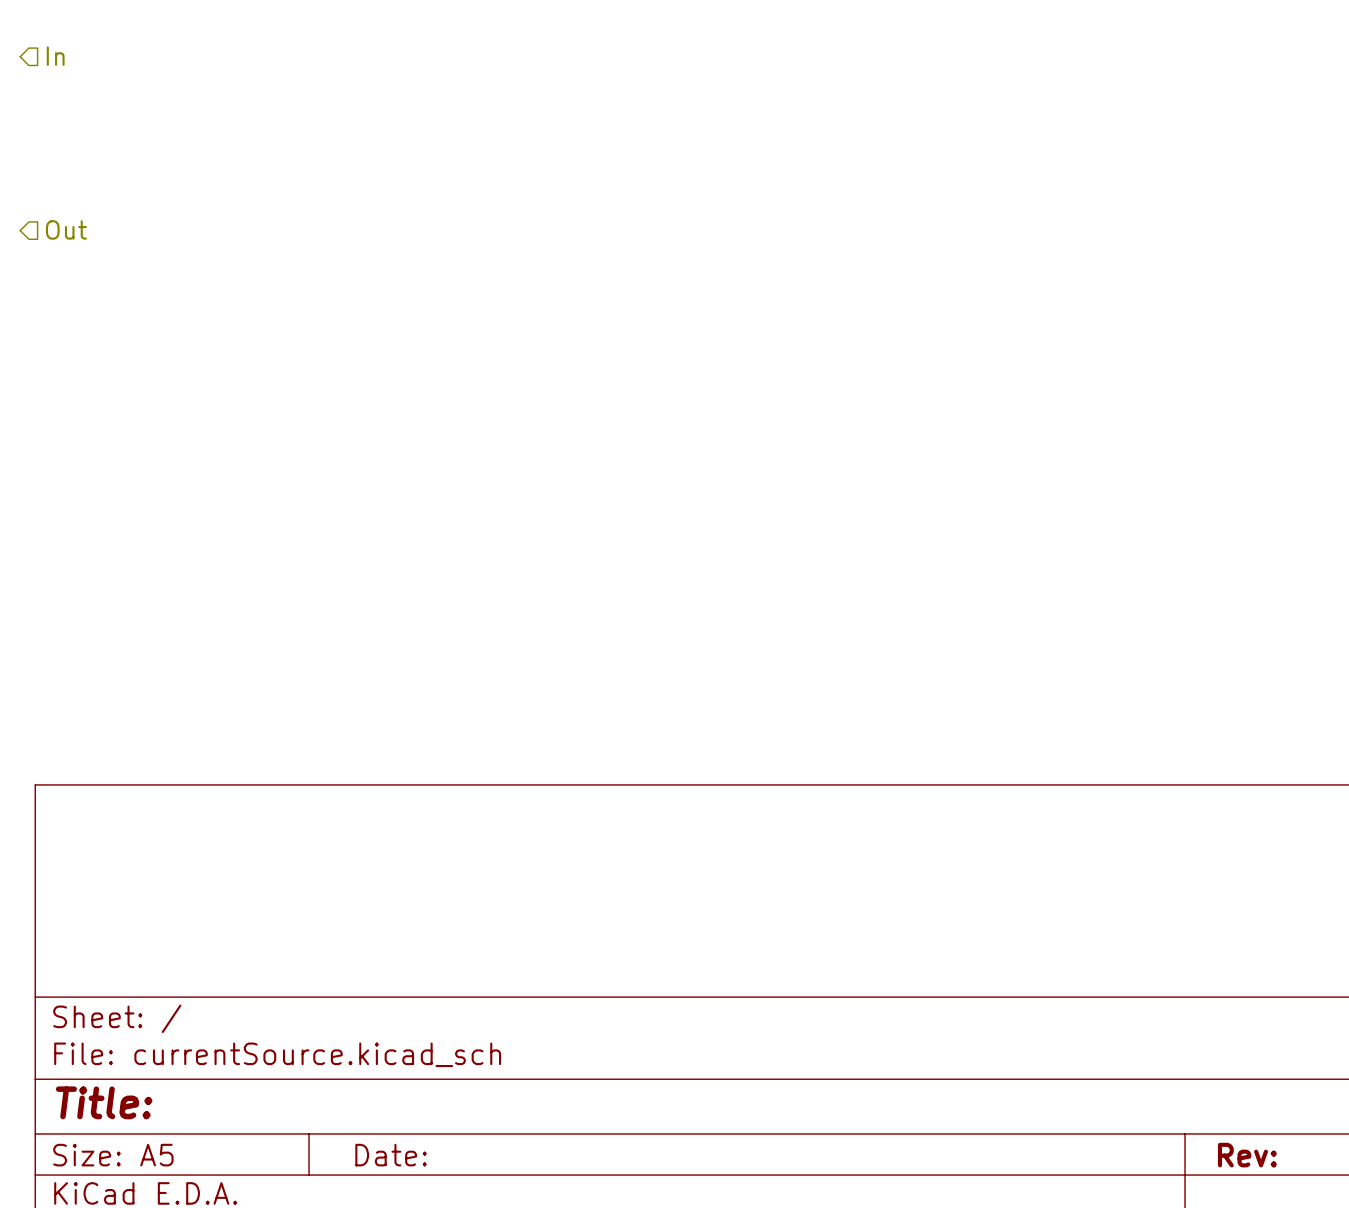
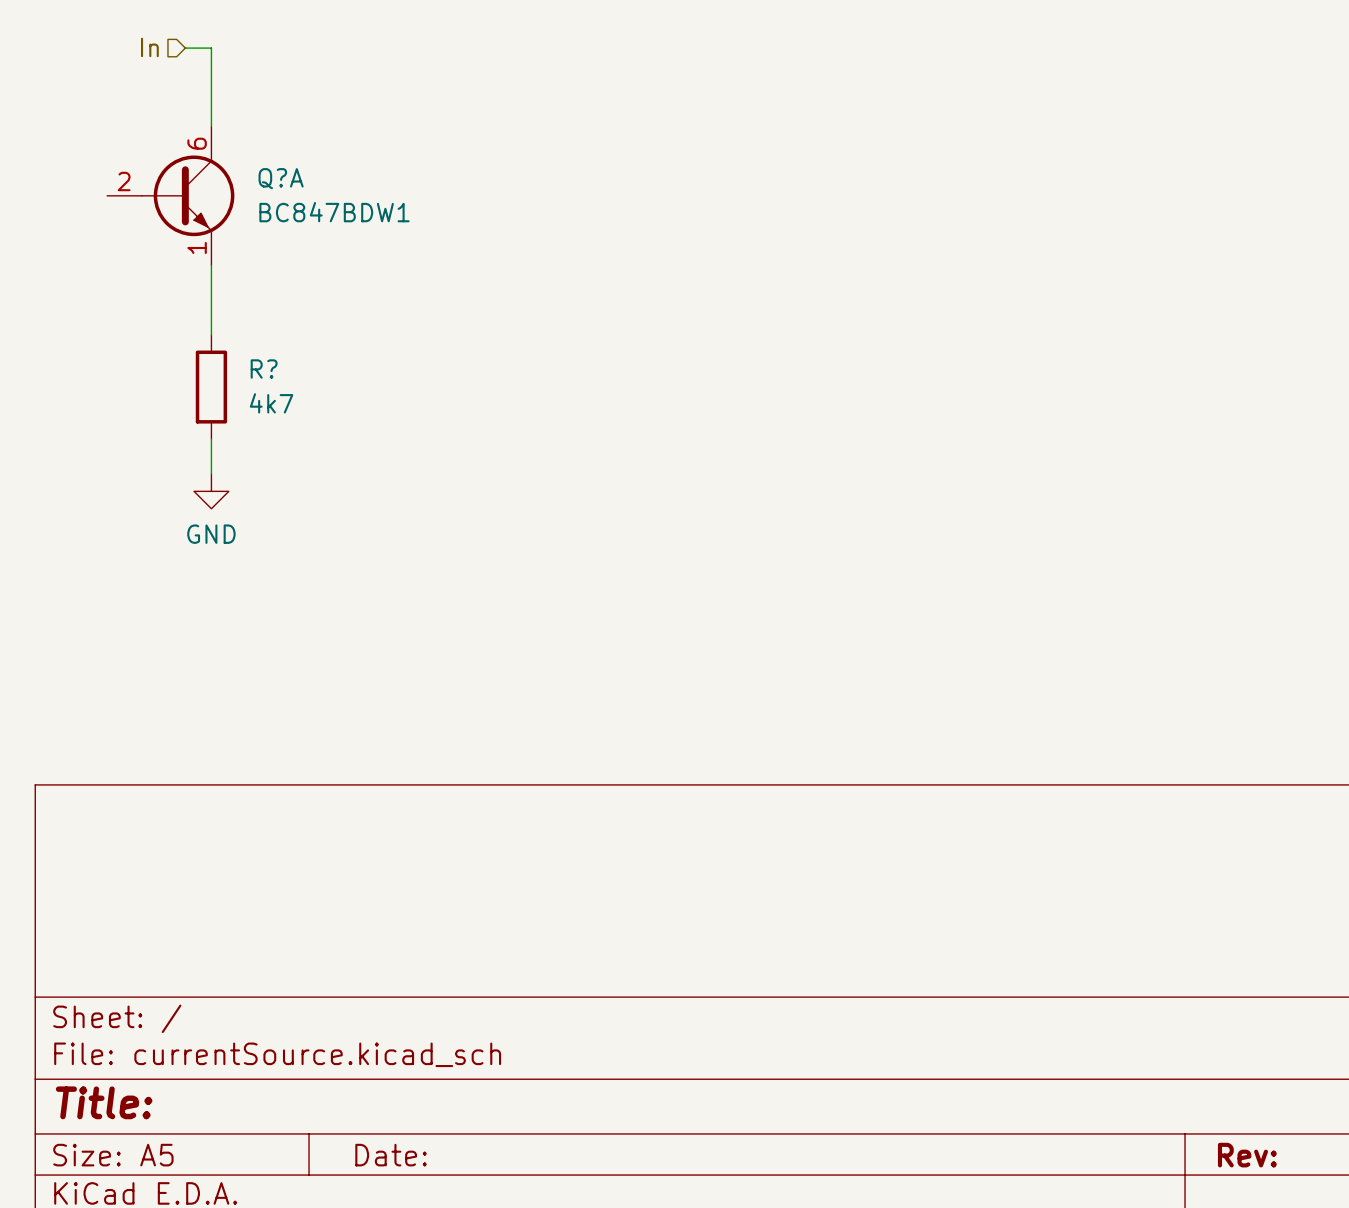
wire: none -> (185, 48) (211, 48) (211, 126)
hierarchical label rotation: 0° (55, 56) -> 180° (149, 47)
hierarchical label position: In (55, 56) -> In (149, 47)
Q?A: none -> BC847BDW1 (170, 195)
hierarchical label: Out (66, 229) -> none
wire: none -> (211, 265) (211, 334)
R?: none -> 4k7 (211, 387)
wire: none -> (211, 439) (211, 473)
power symbol: none -> GND (211, 491)

